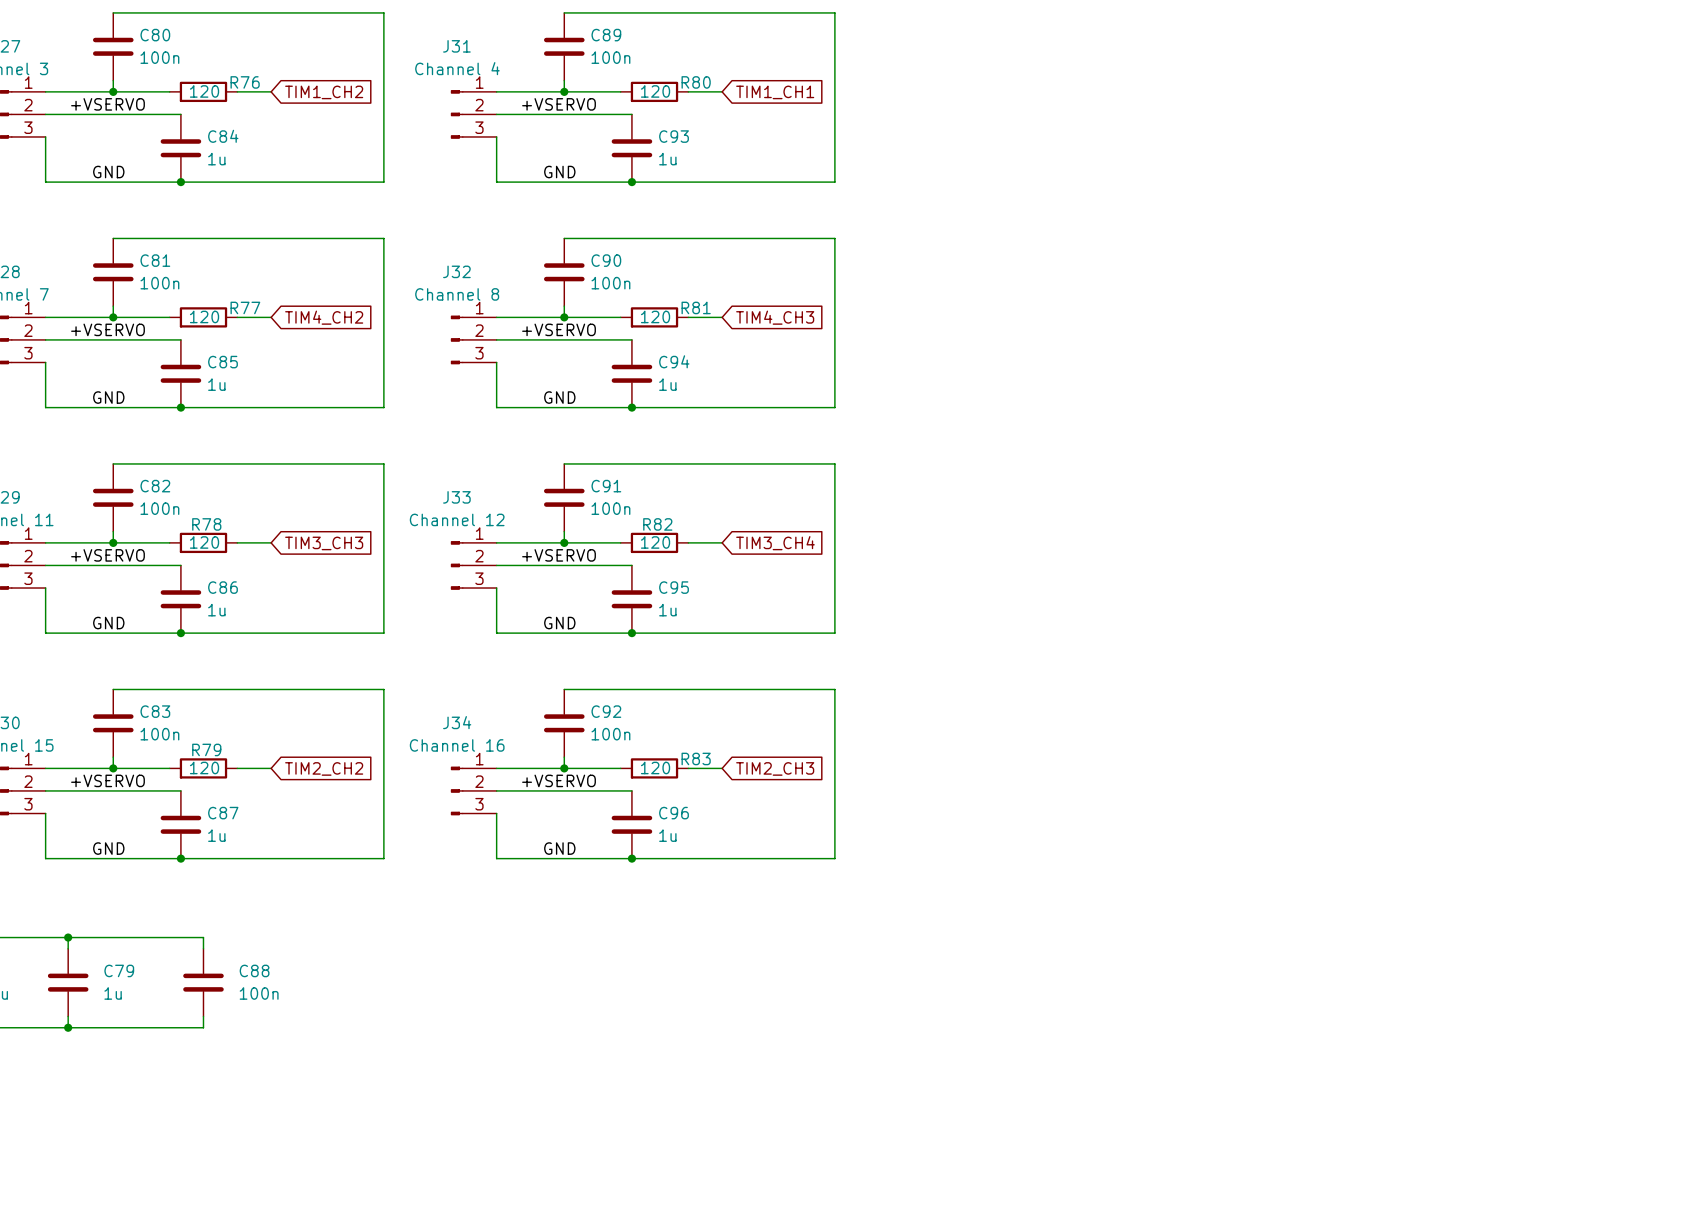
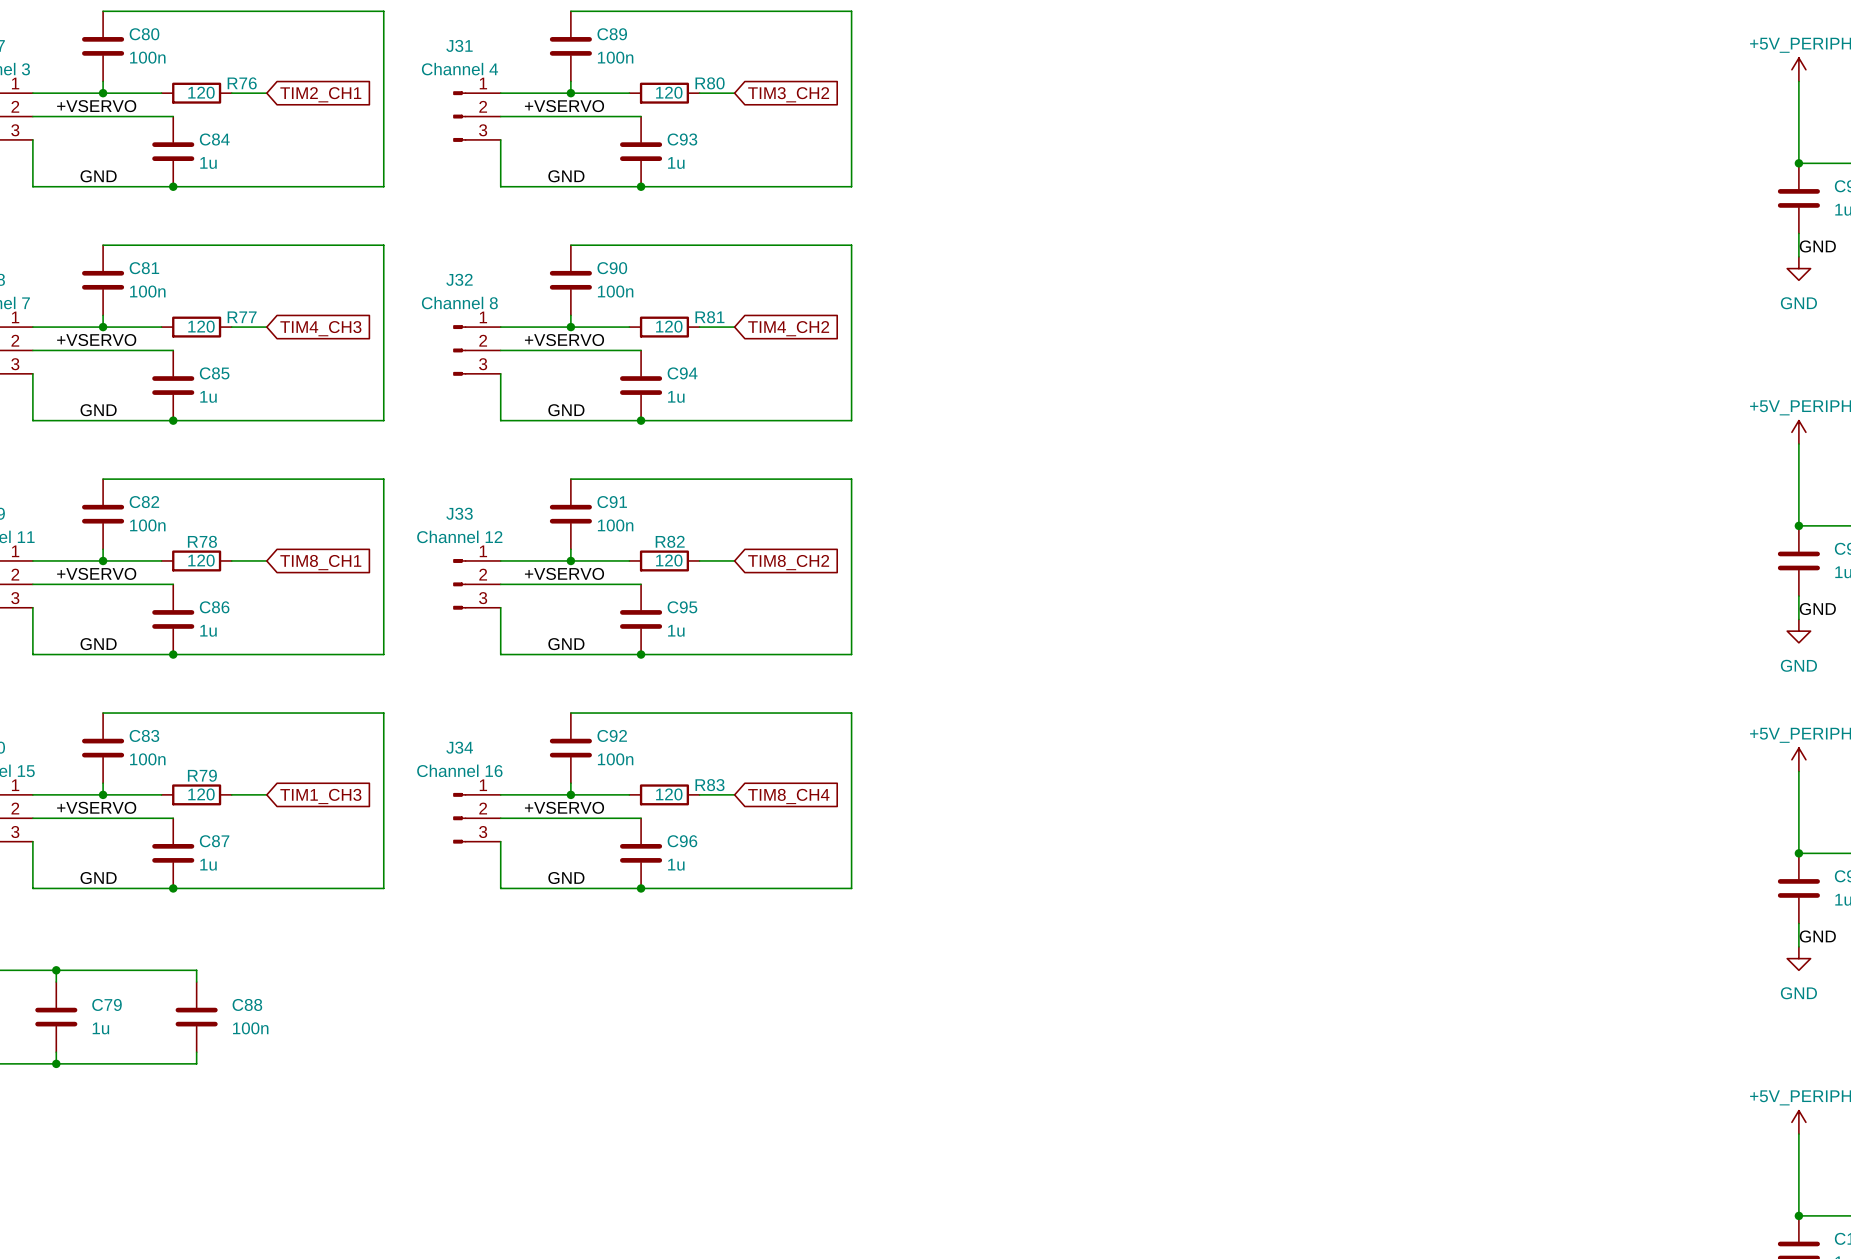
global label: TIM1_CH2 (324, 92) -> TIM2_CH1 (320, 94)
global label: TIM1_CH1 (775, 92) -> TIM3_CH2 (788, 94)
global label: TIM4_CH2 (324, 317) -> TIM4_CH3 (320, 328)
global label: TIM4_CH3 (775, 317) -> TIM4_CH2 (788, 328)
global label: TIM3_CH3 (324, 543) -> TIM8_CH1 (320, 562)
global label: TIM3_CH4 (775, 543) -> TIM8_CH2 (788, 562)
global label: TIM2_CH2 (324, 768) -> TIM1_CH3 (320, 796)
global label: TIM2_CH3 (775, 768) -> TIM8_CH4 (788, 796)

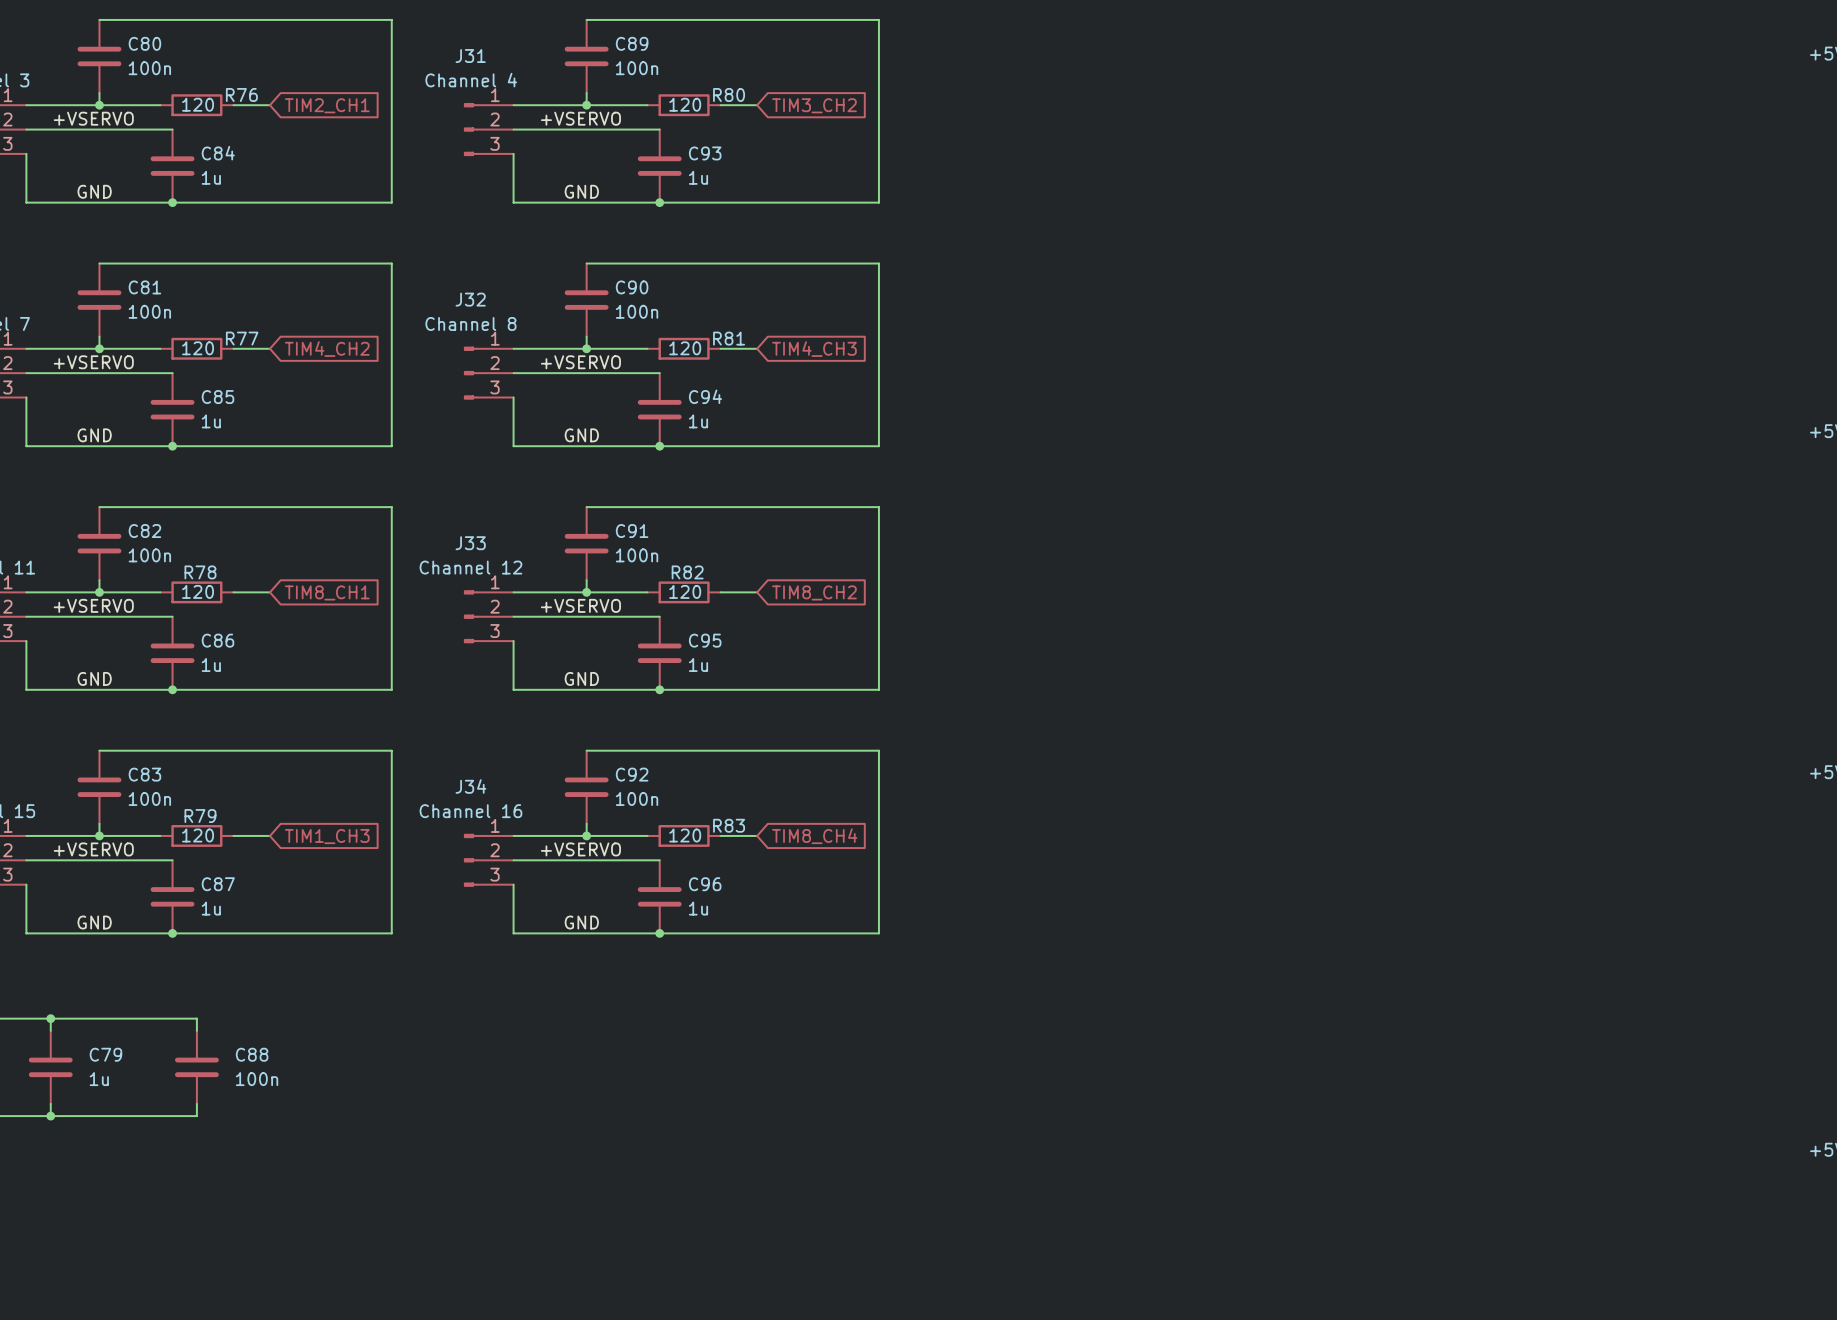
global label: TIM4_CH3 (320, 328) -> TIM4_CH2 (327, 349)
global label: TIM4_CH2 (788, 328) -> TIM4_CH3 (814, 349)

